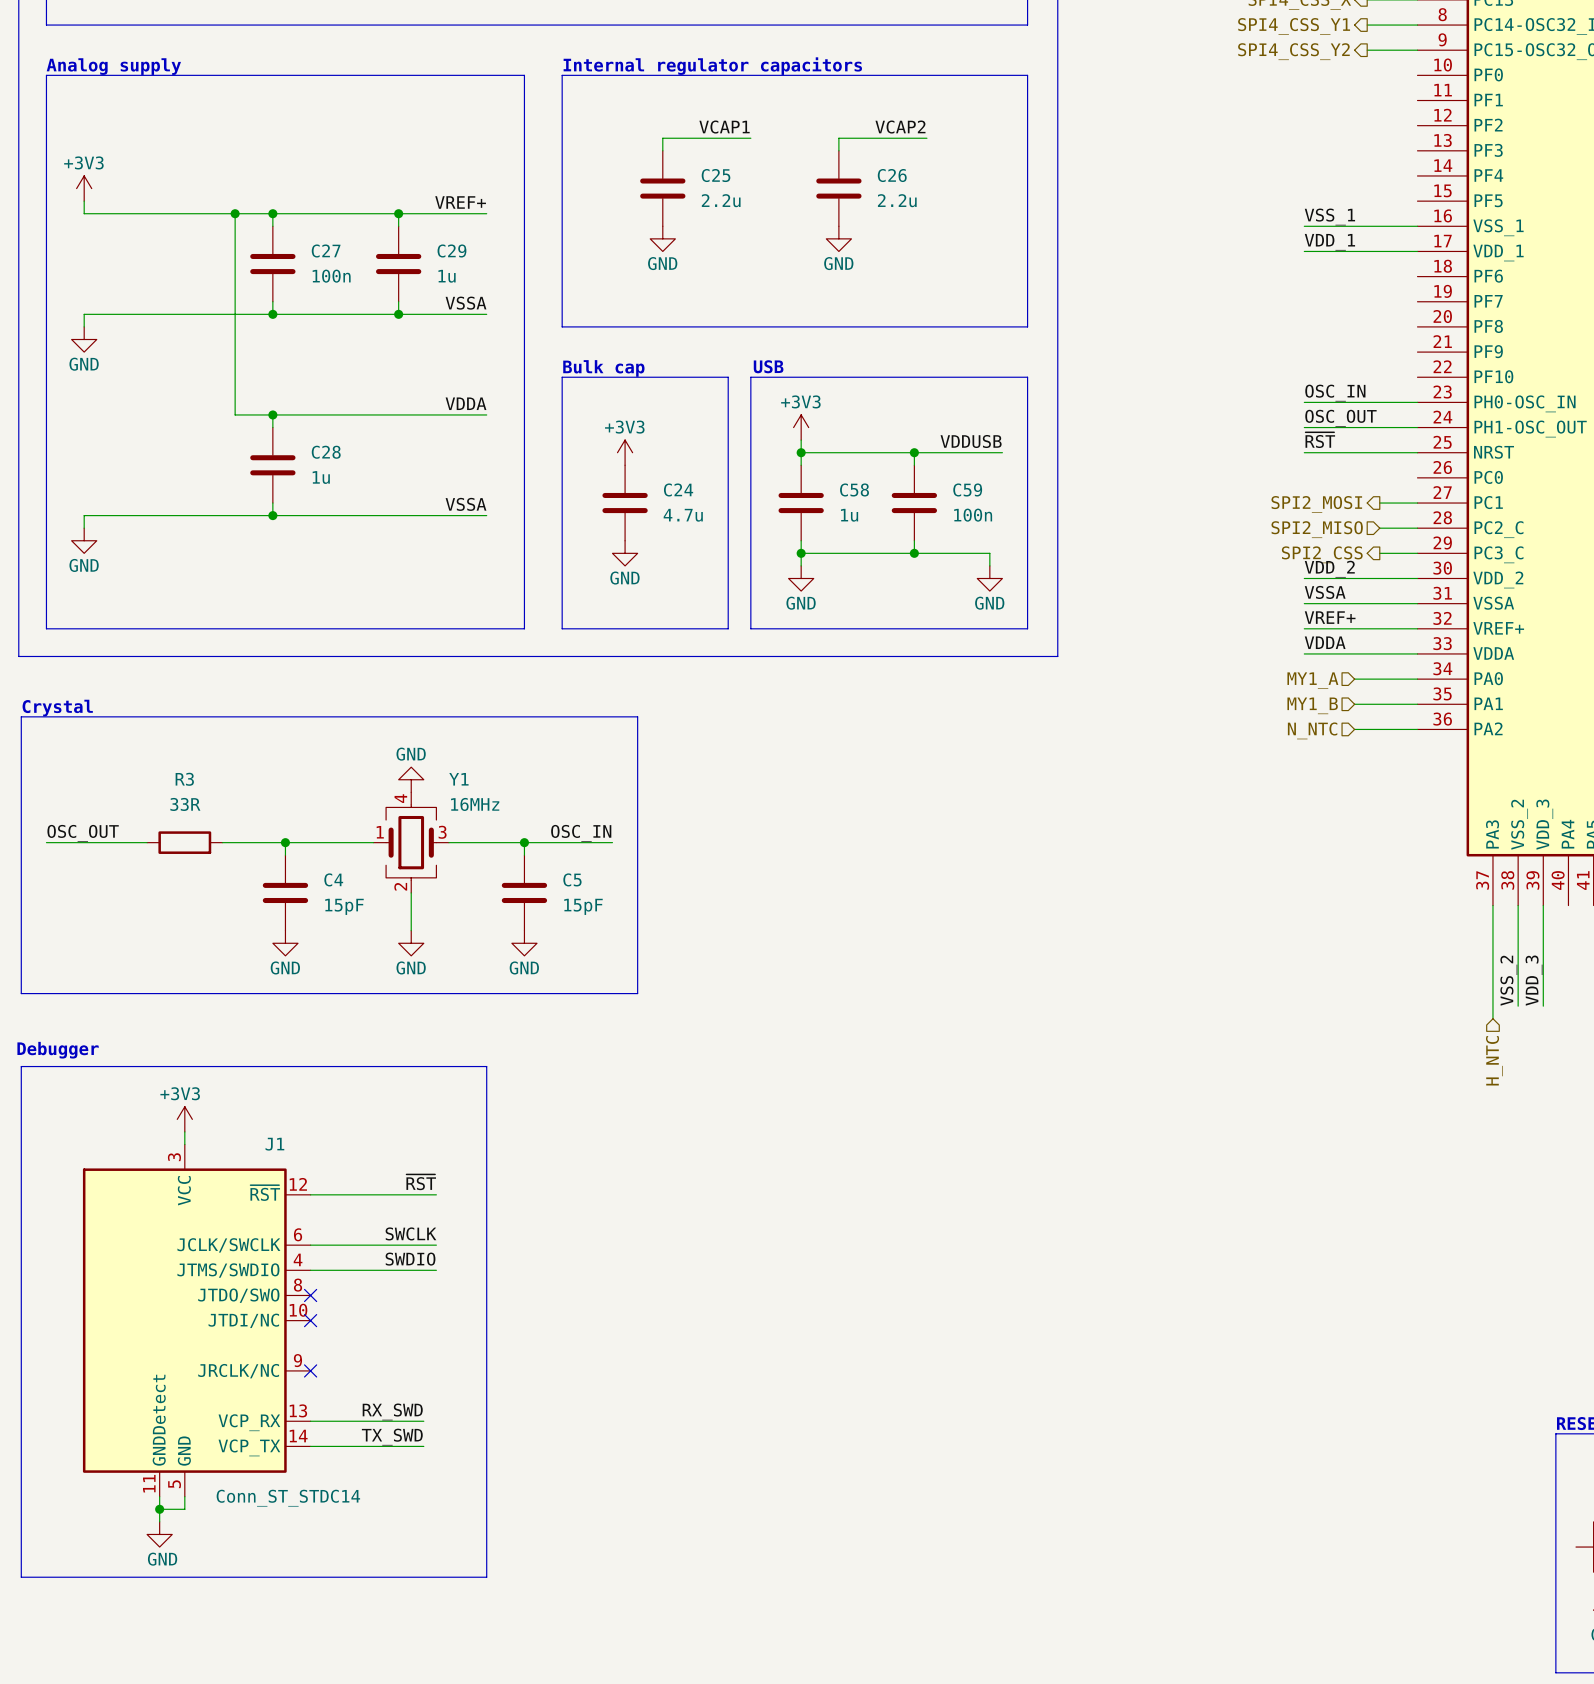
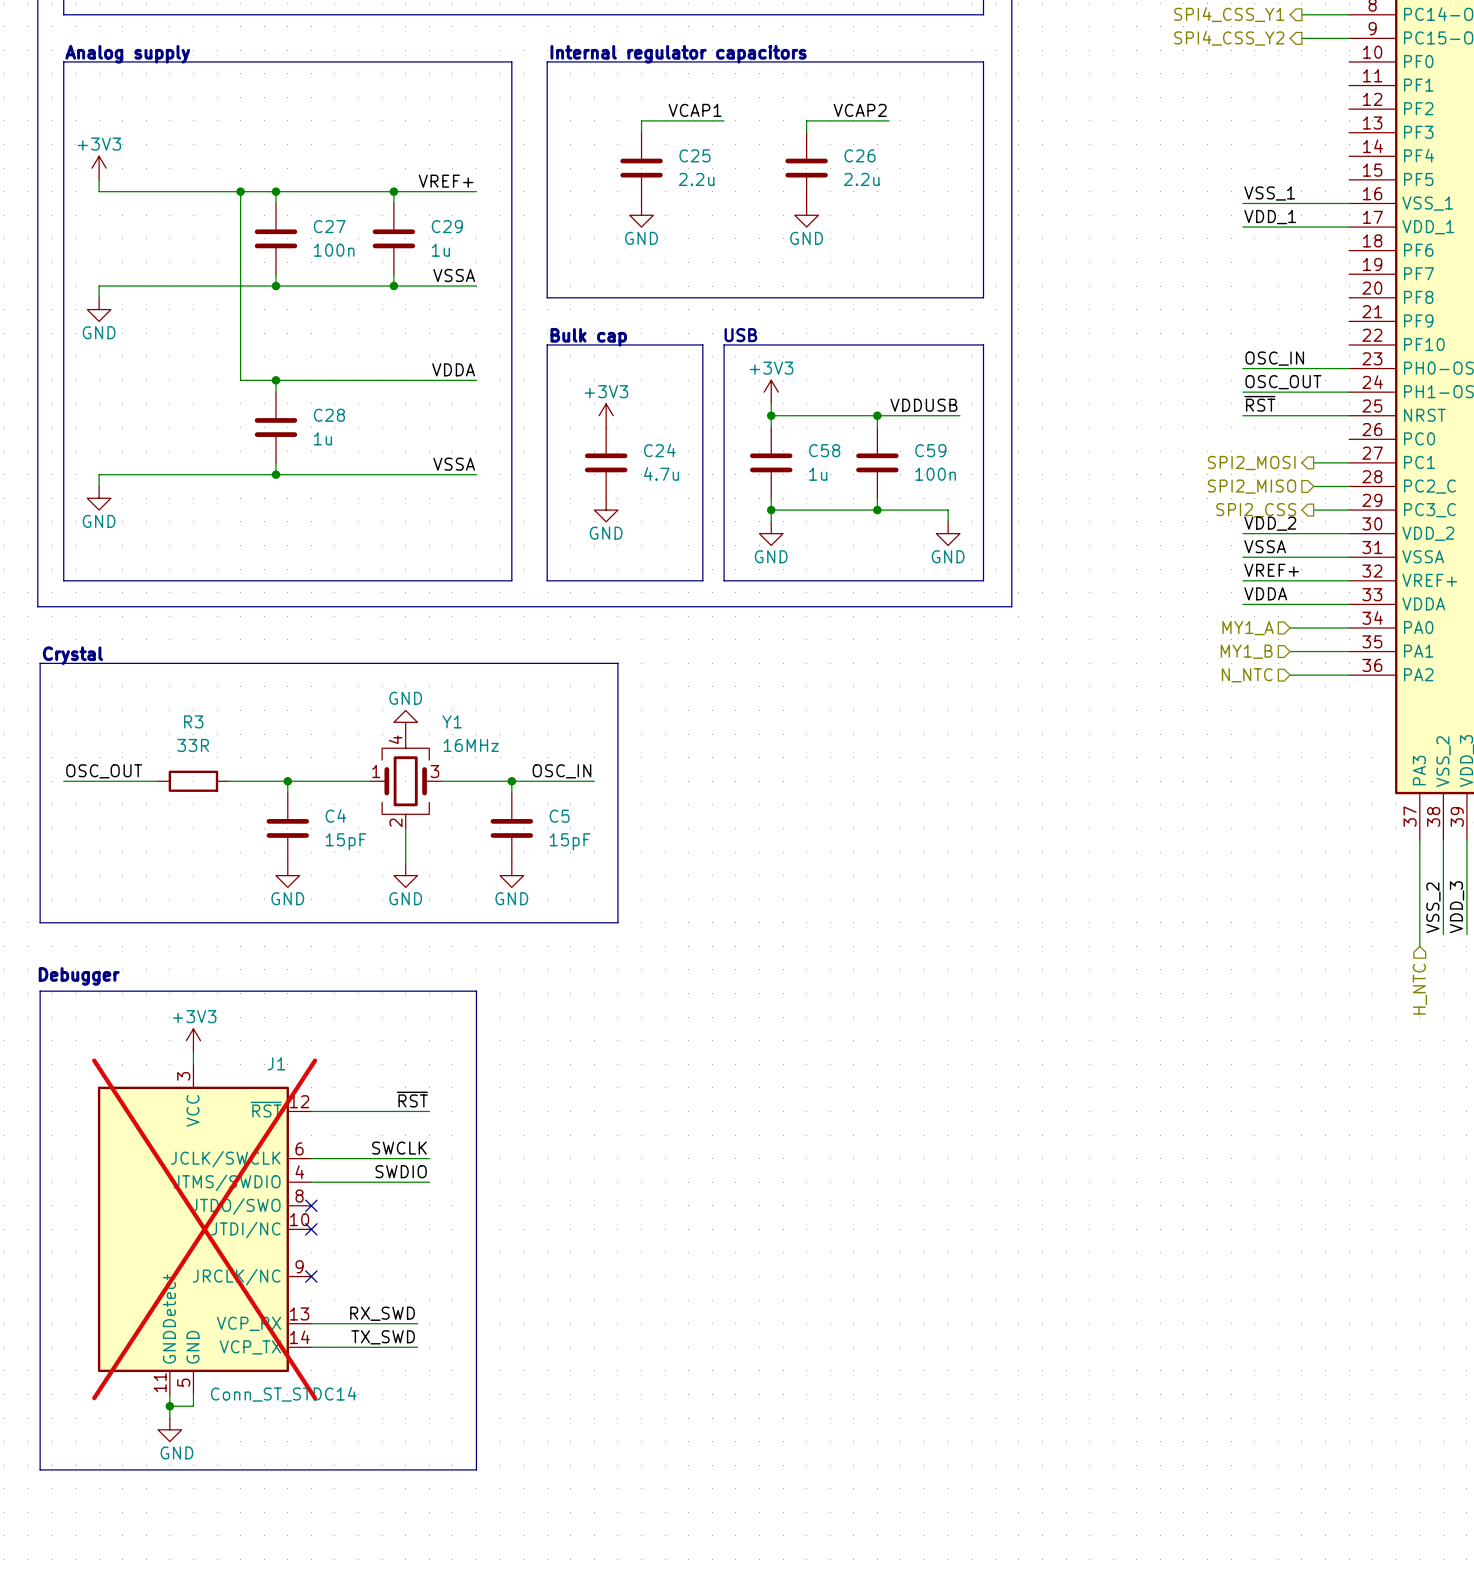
J1 do-not-place cross: none -> (204, 1229)

